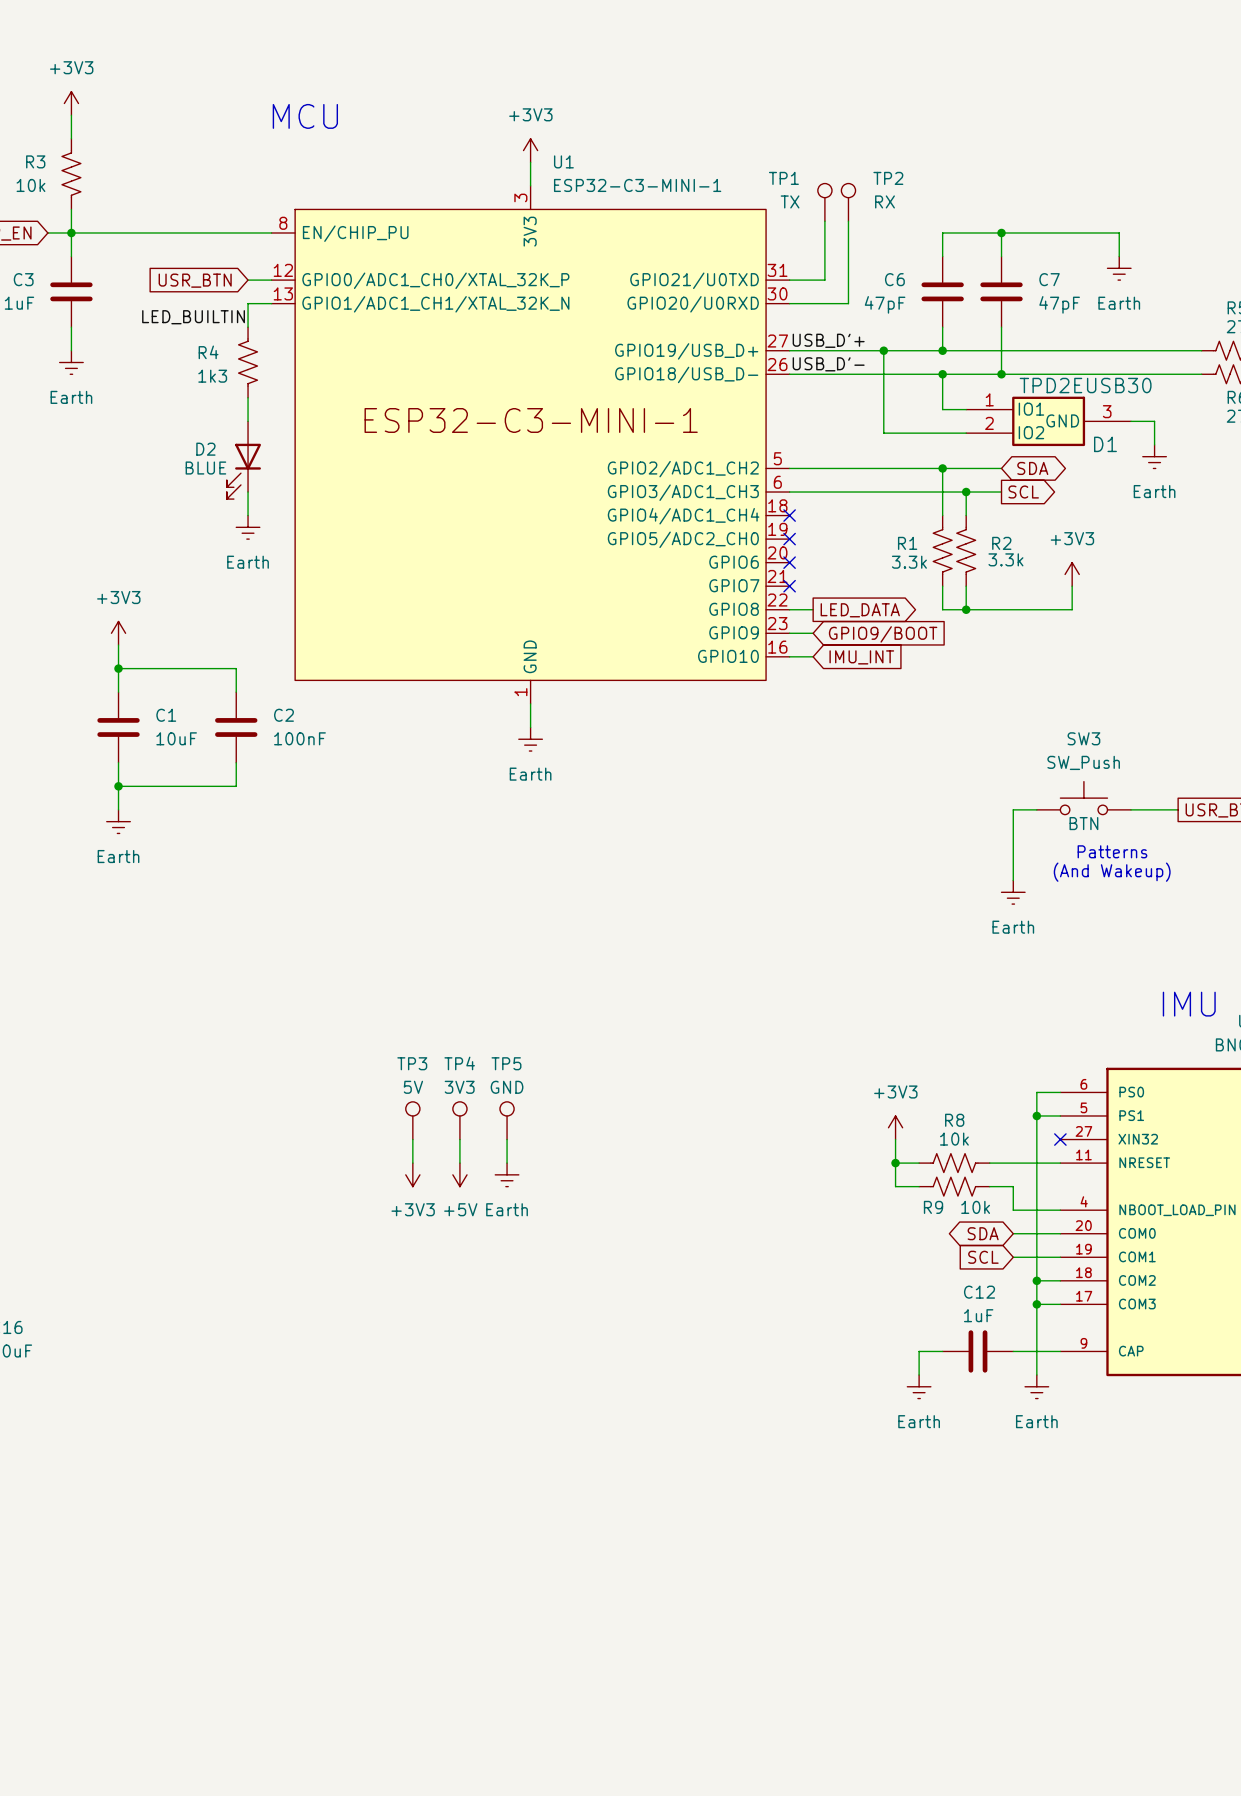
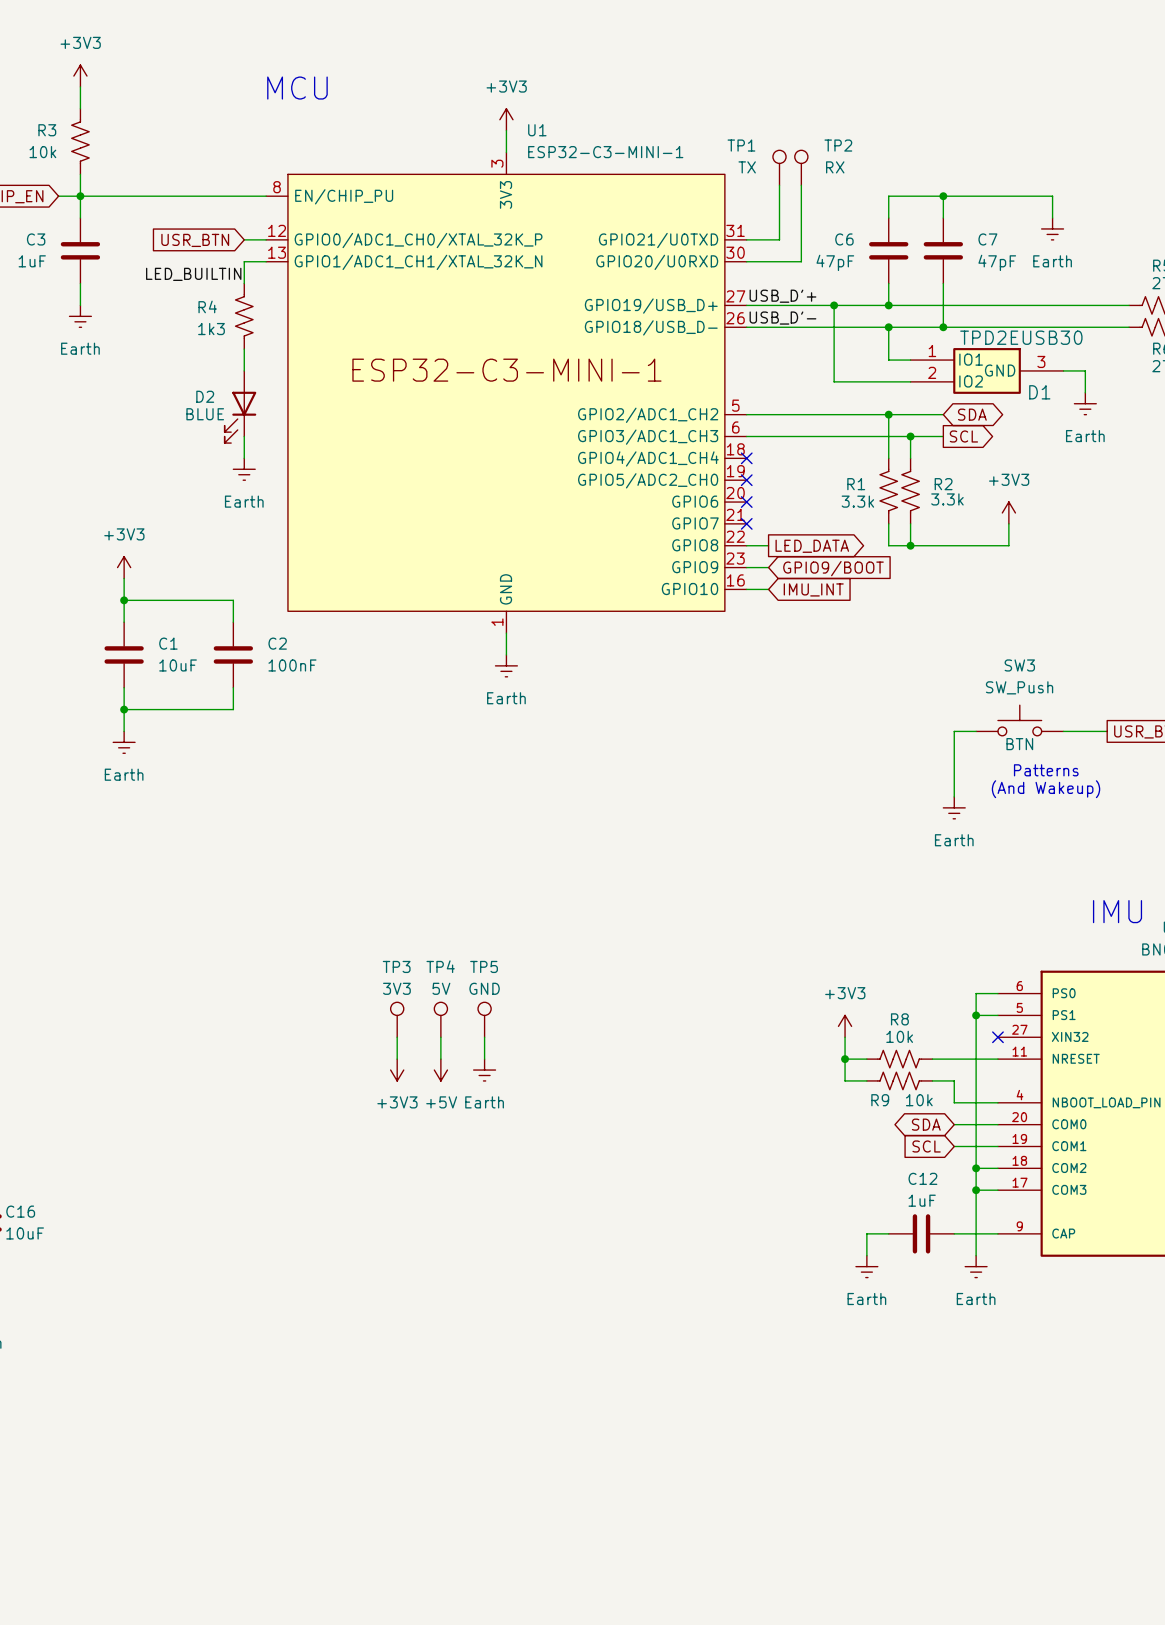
TP3 value: 5V (413, 1087) -> 3V3 (396, 988)
TP4 value: 3V3 (459, 1087) -> 5V (441, 988)

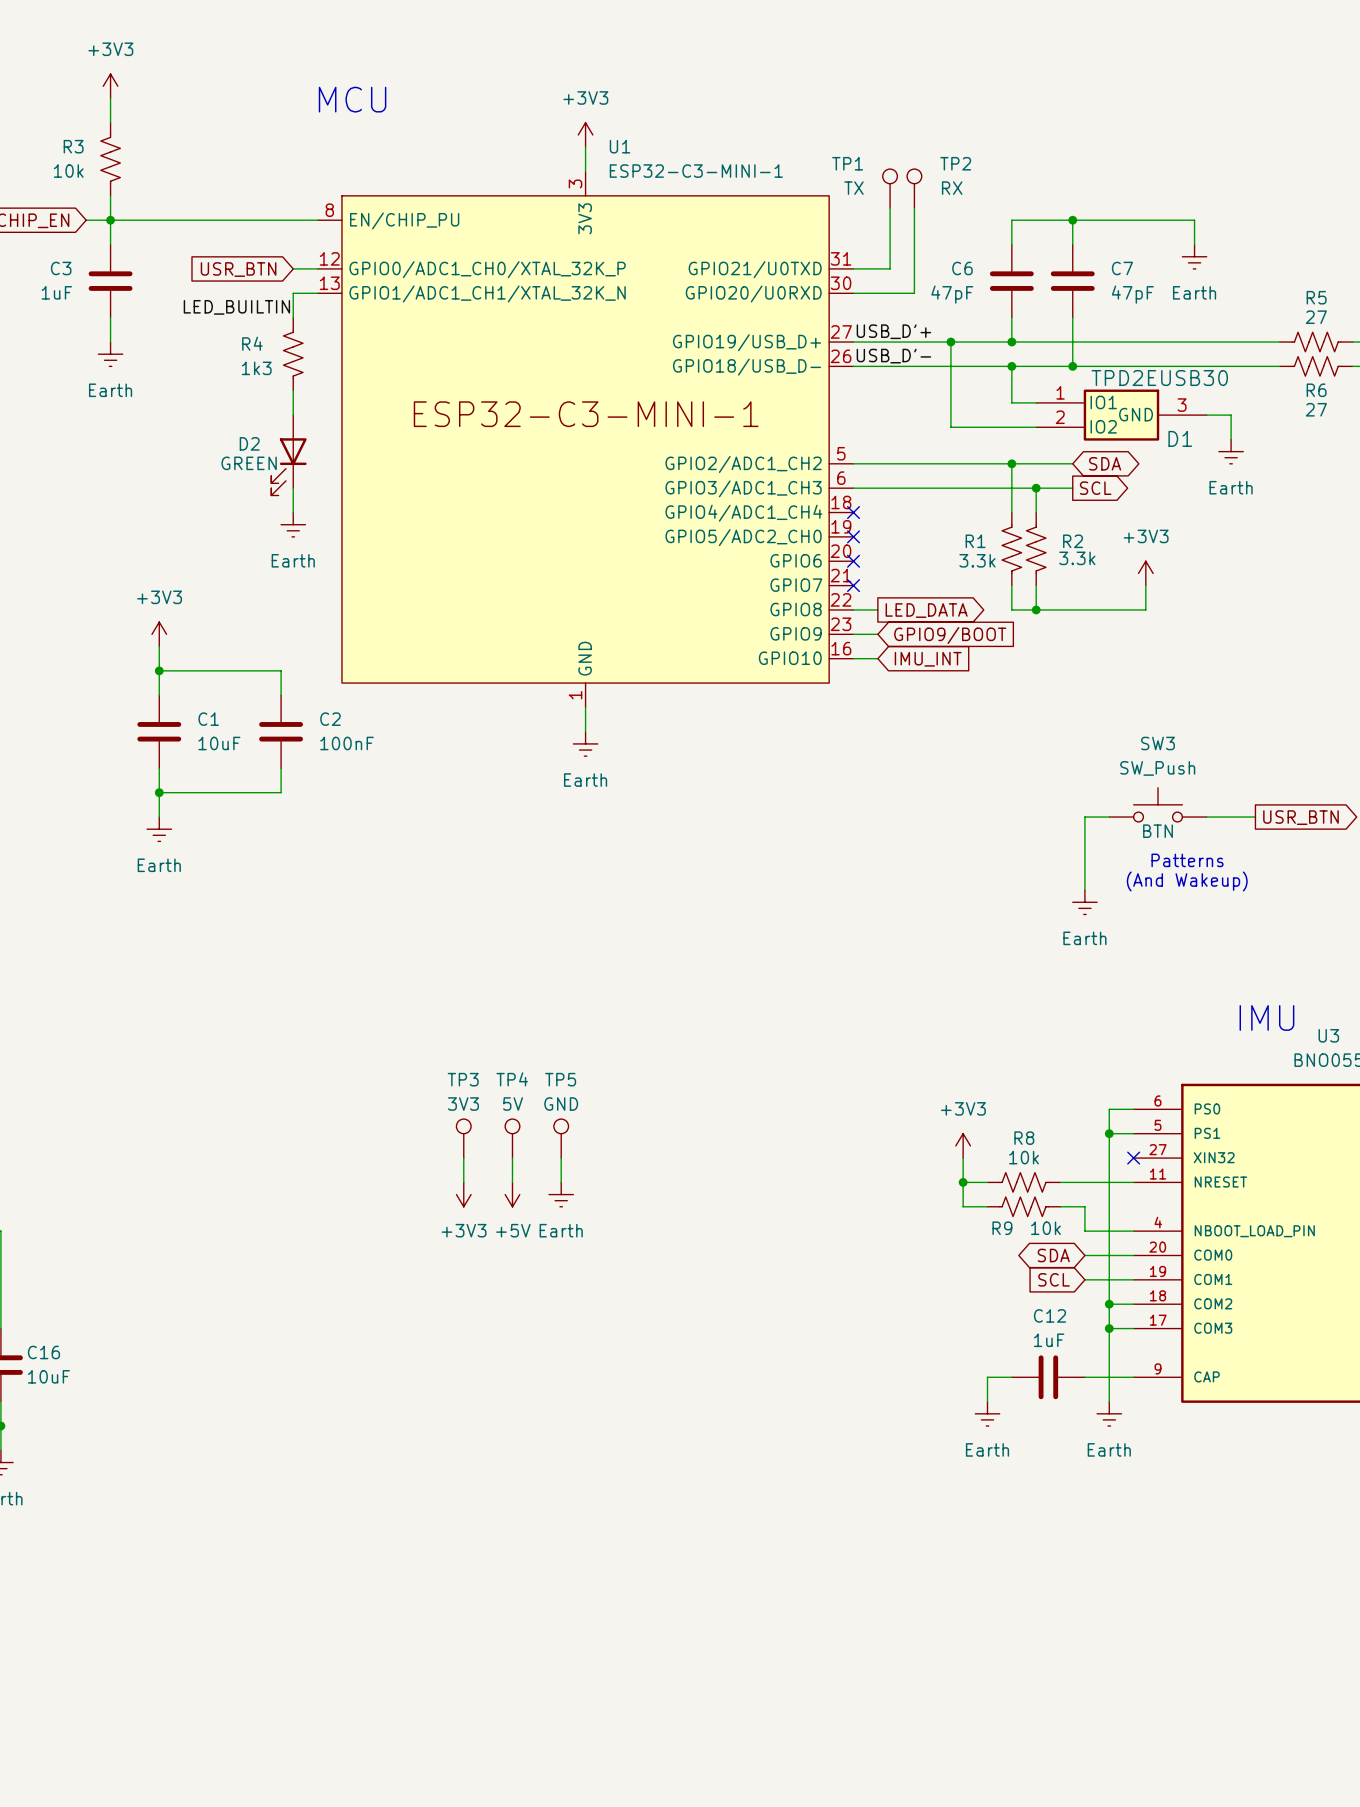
D2 value: BLUE (205, 414) -> GREEN (249, 463)

